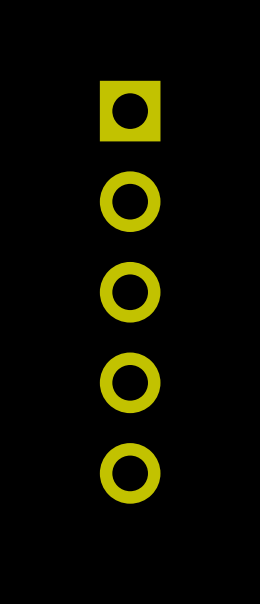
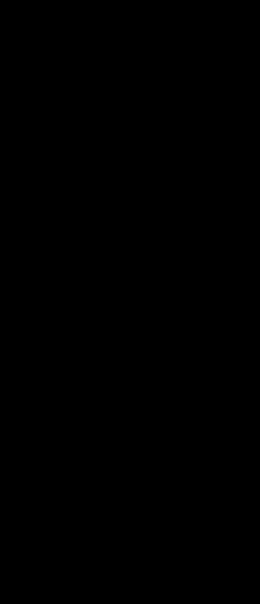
part: (130, 292) -> none

